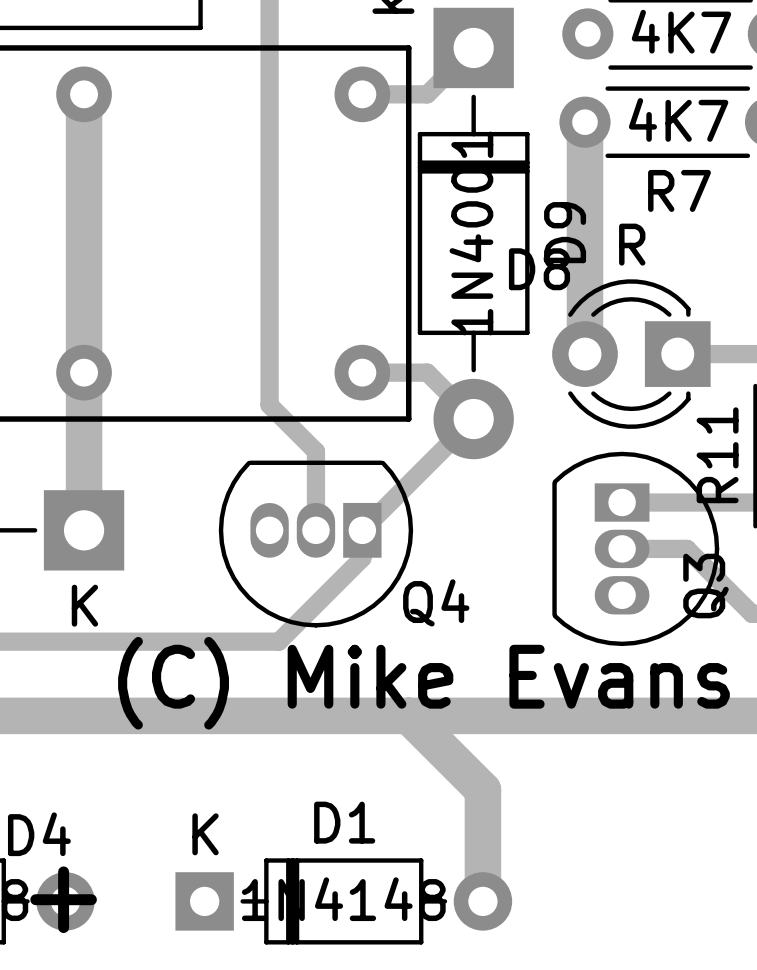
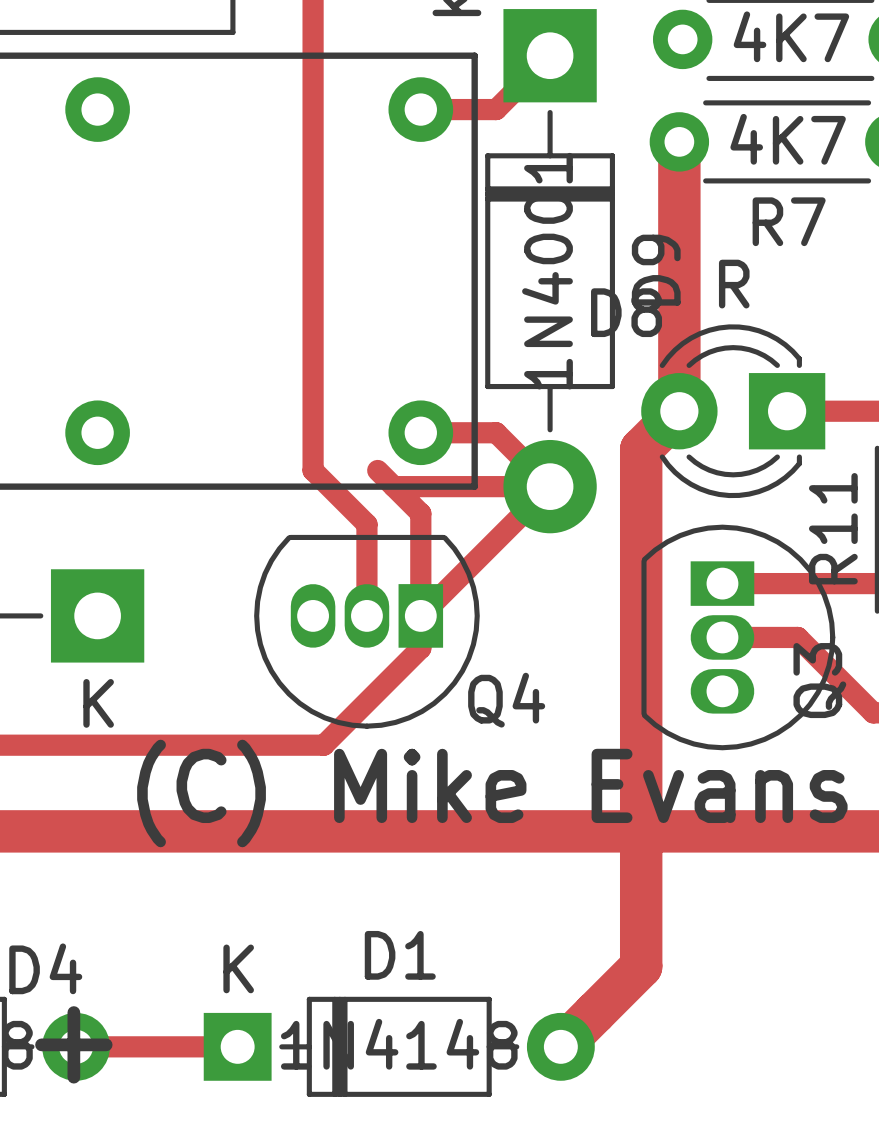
track: (84, 94) (84, 530) -> none
track: none -> (377, 470) (420, 513) (420, 615)
track: none -> (393, 486) (550, 486)
track: (408, 715) (482, 790) (482, 901) -> (679, 411) (641, 449) (641, 966) (560, 1046)
track: none -> (76, 1046) (237, 1046)

